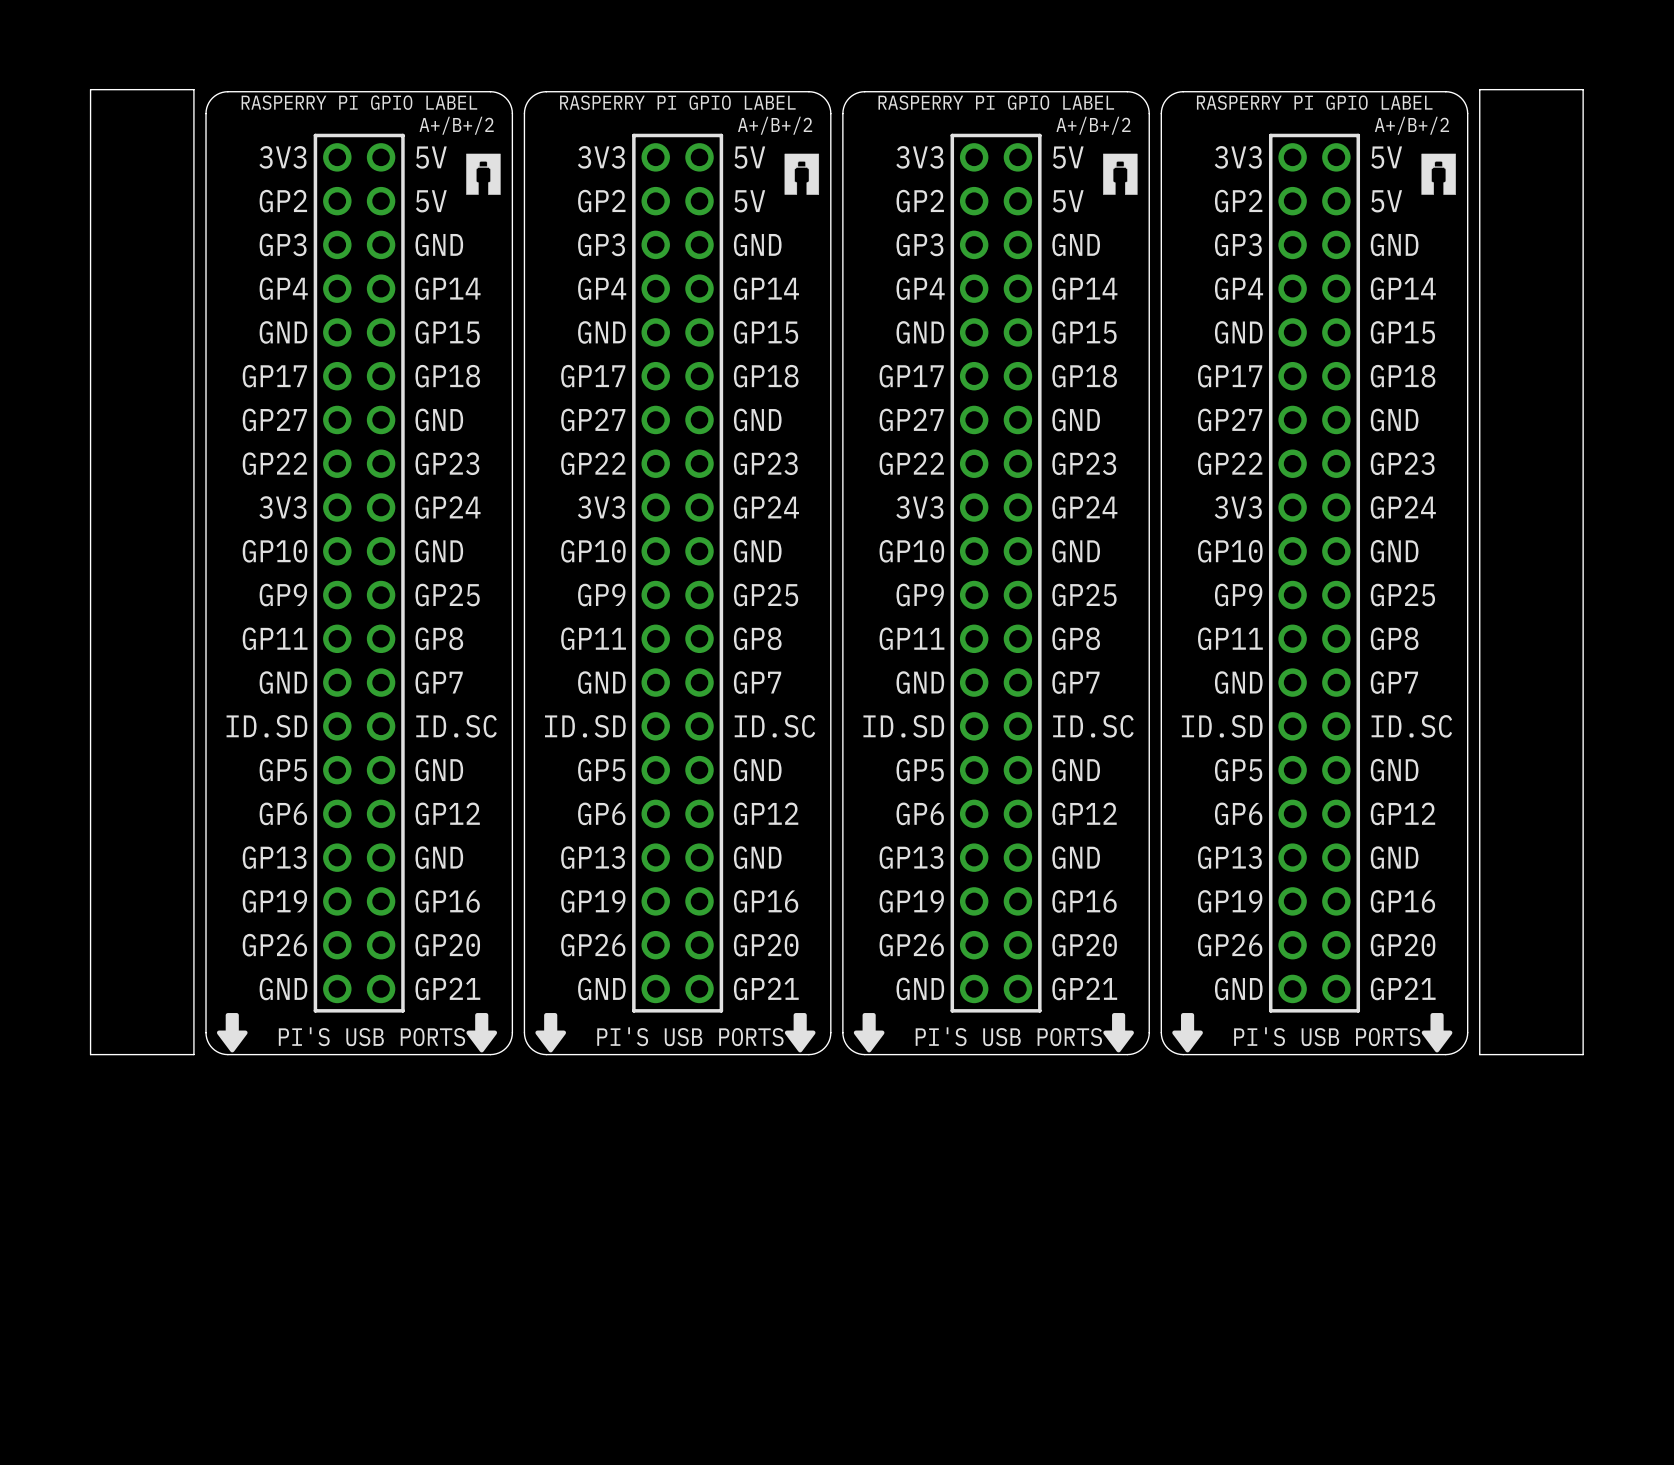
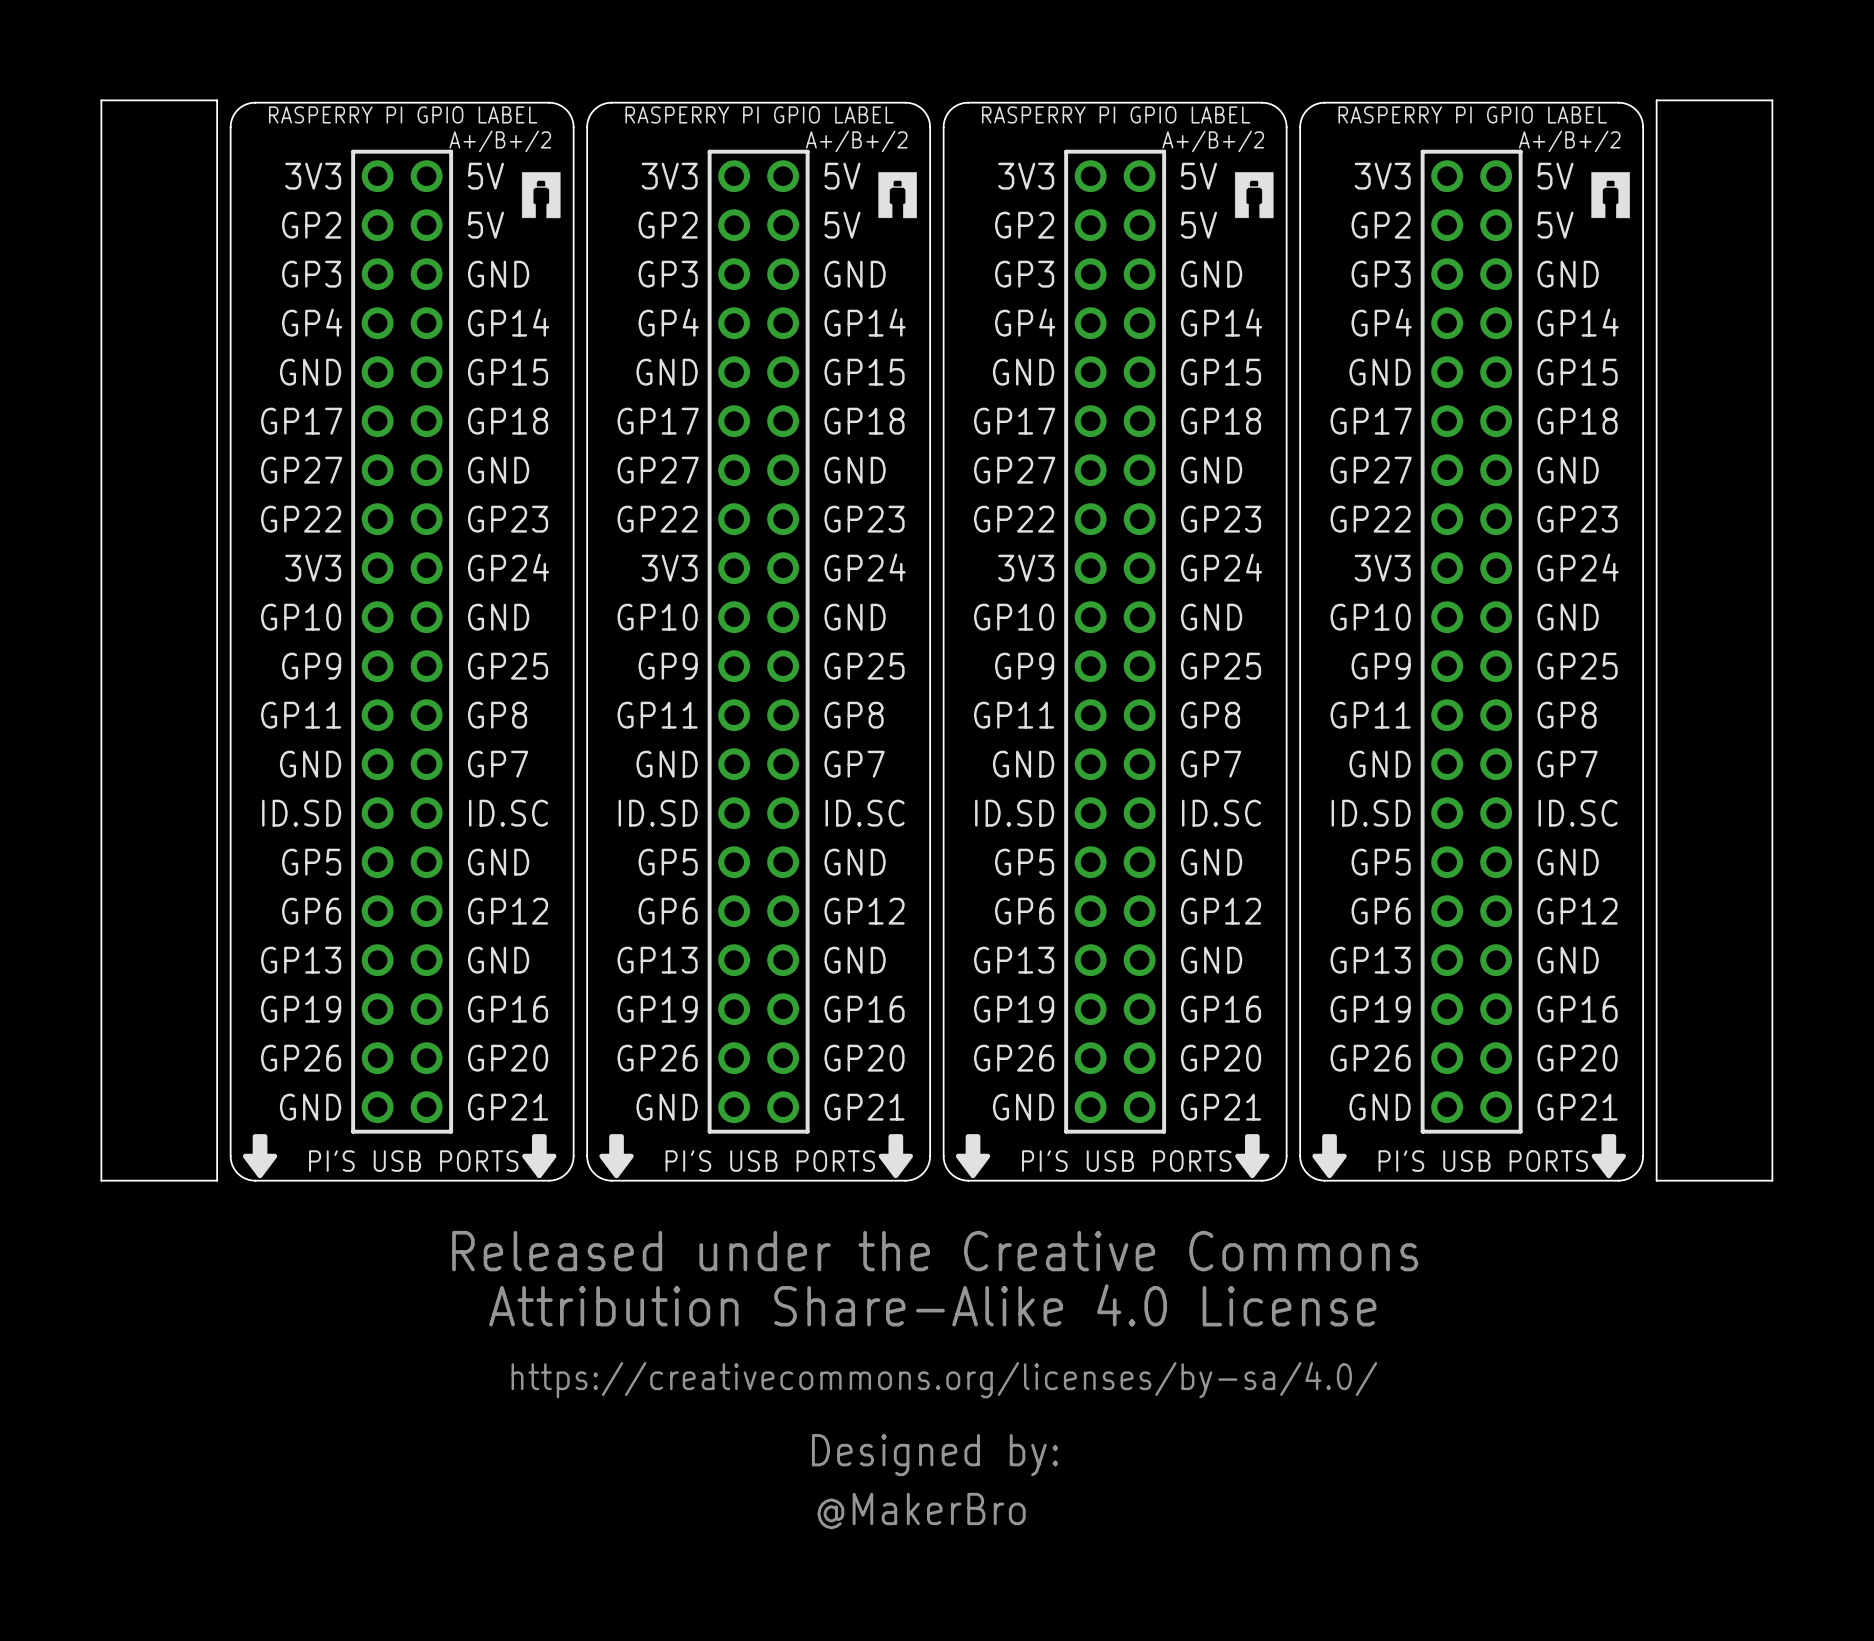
drawing: none -> [452, 1230, 1419, 1477]
text: none -> @MakerBro (921, 1511)

